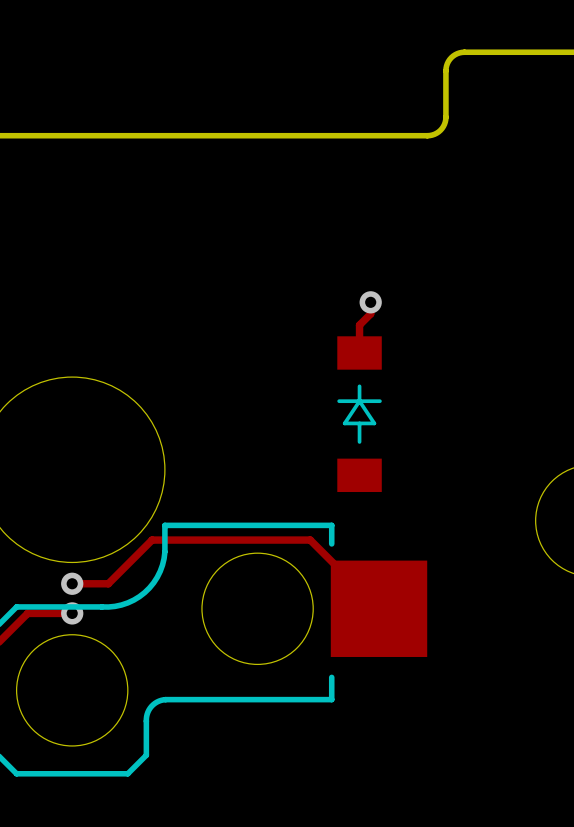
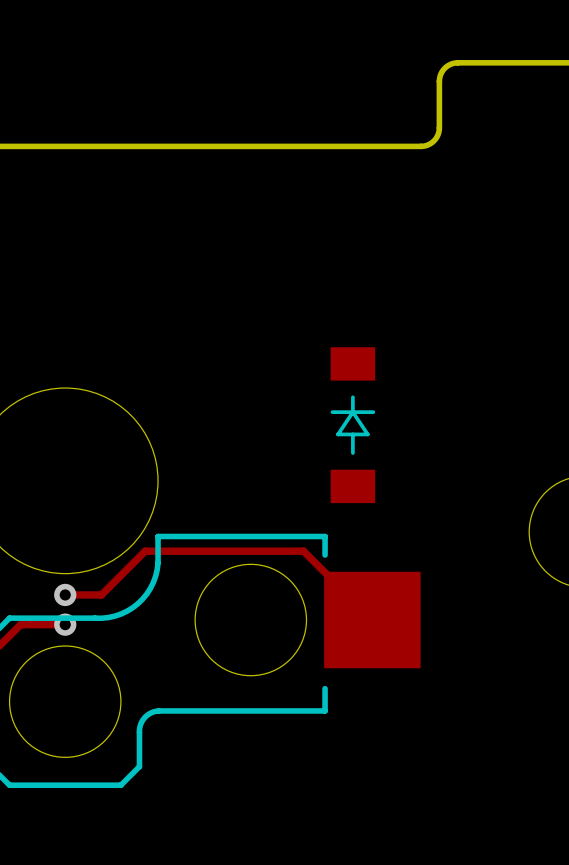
track: (370, 302) (370, 313) (359, 325) (359, 352) -> none
via: (370, 302) -> none

